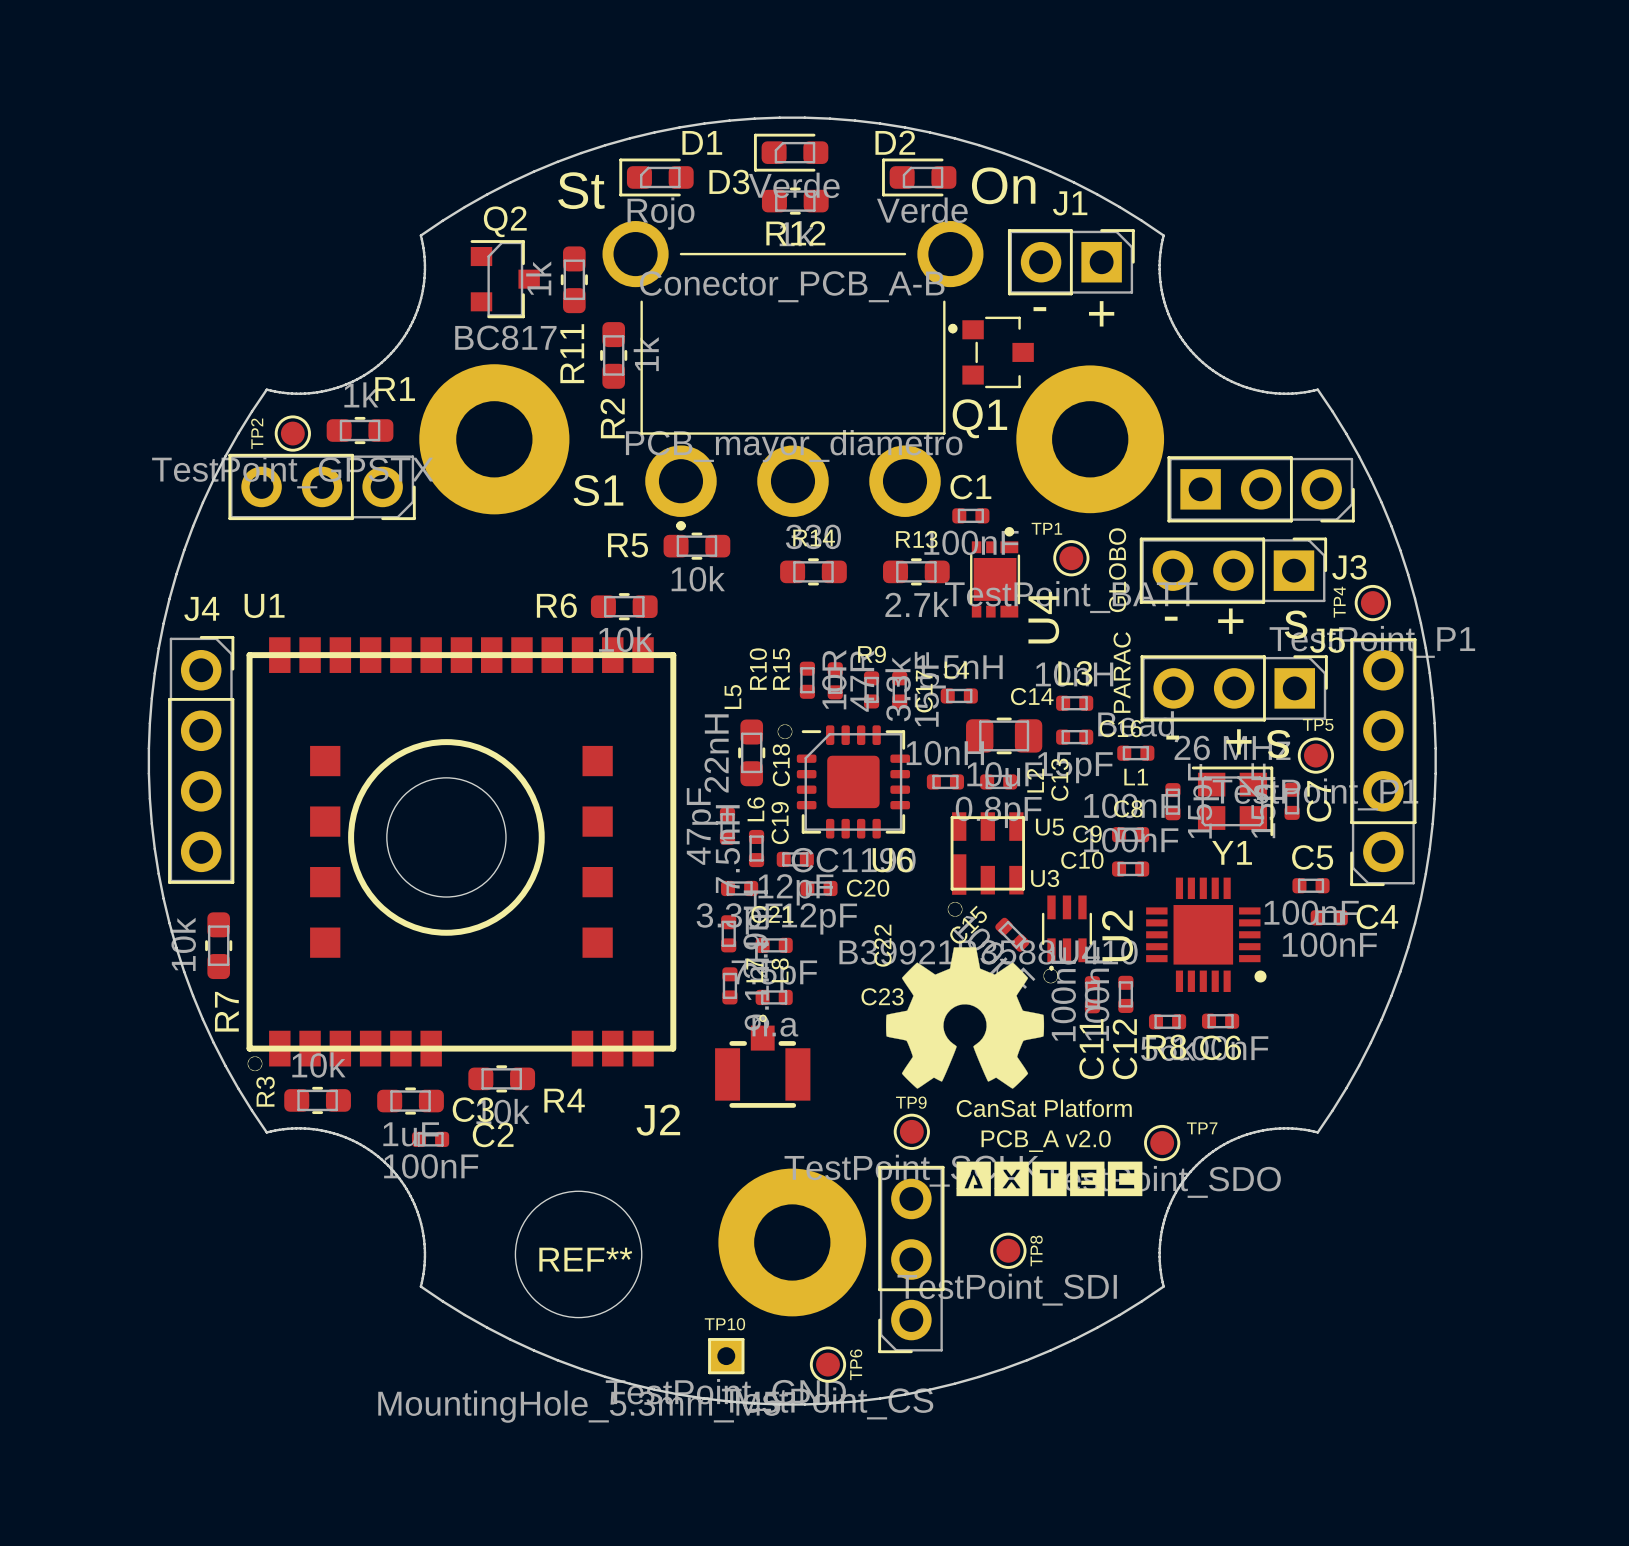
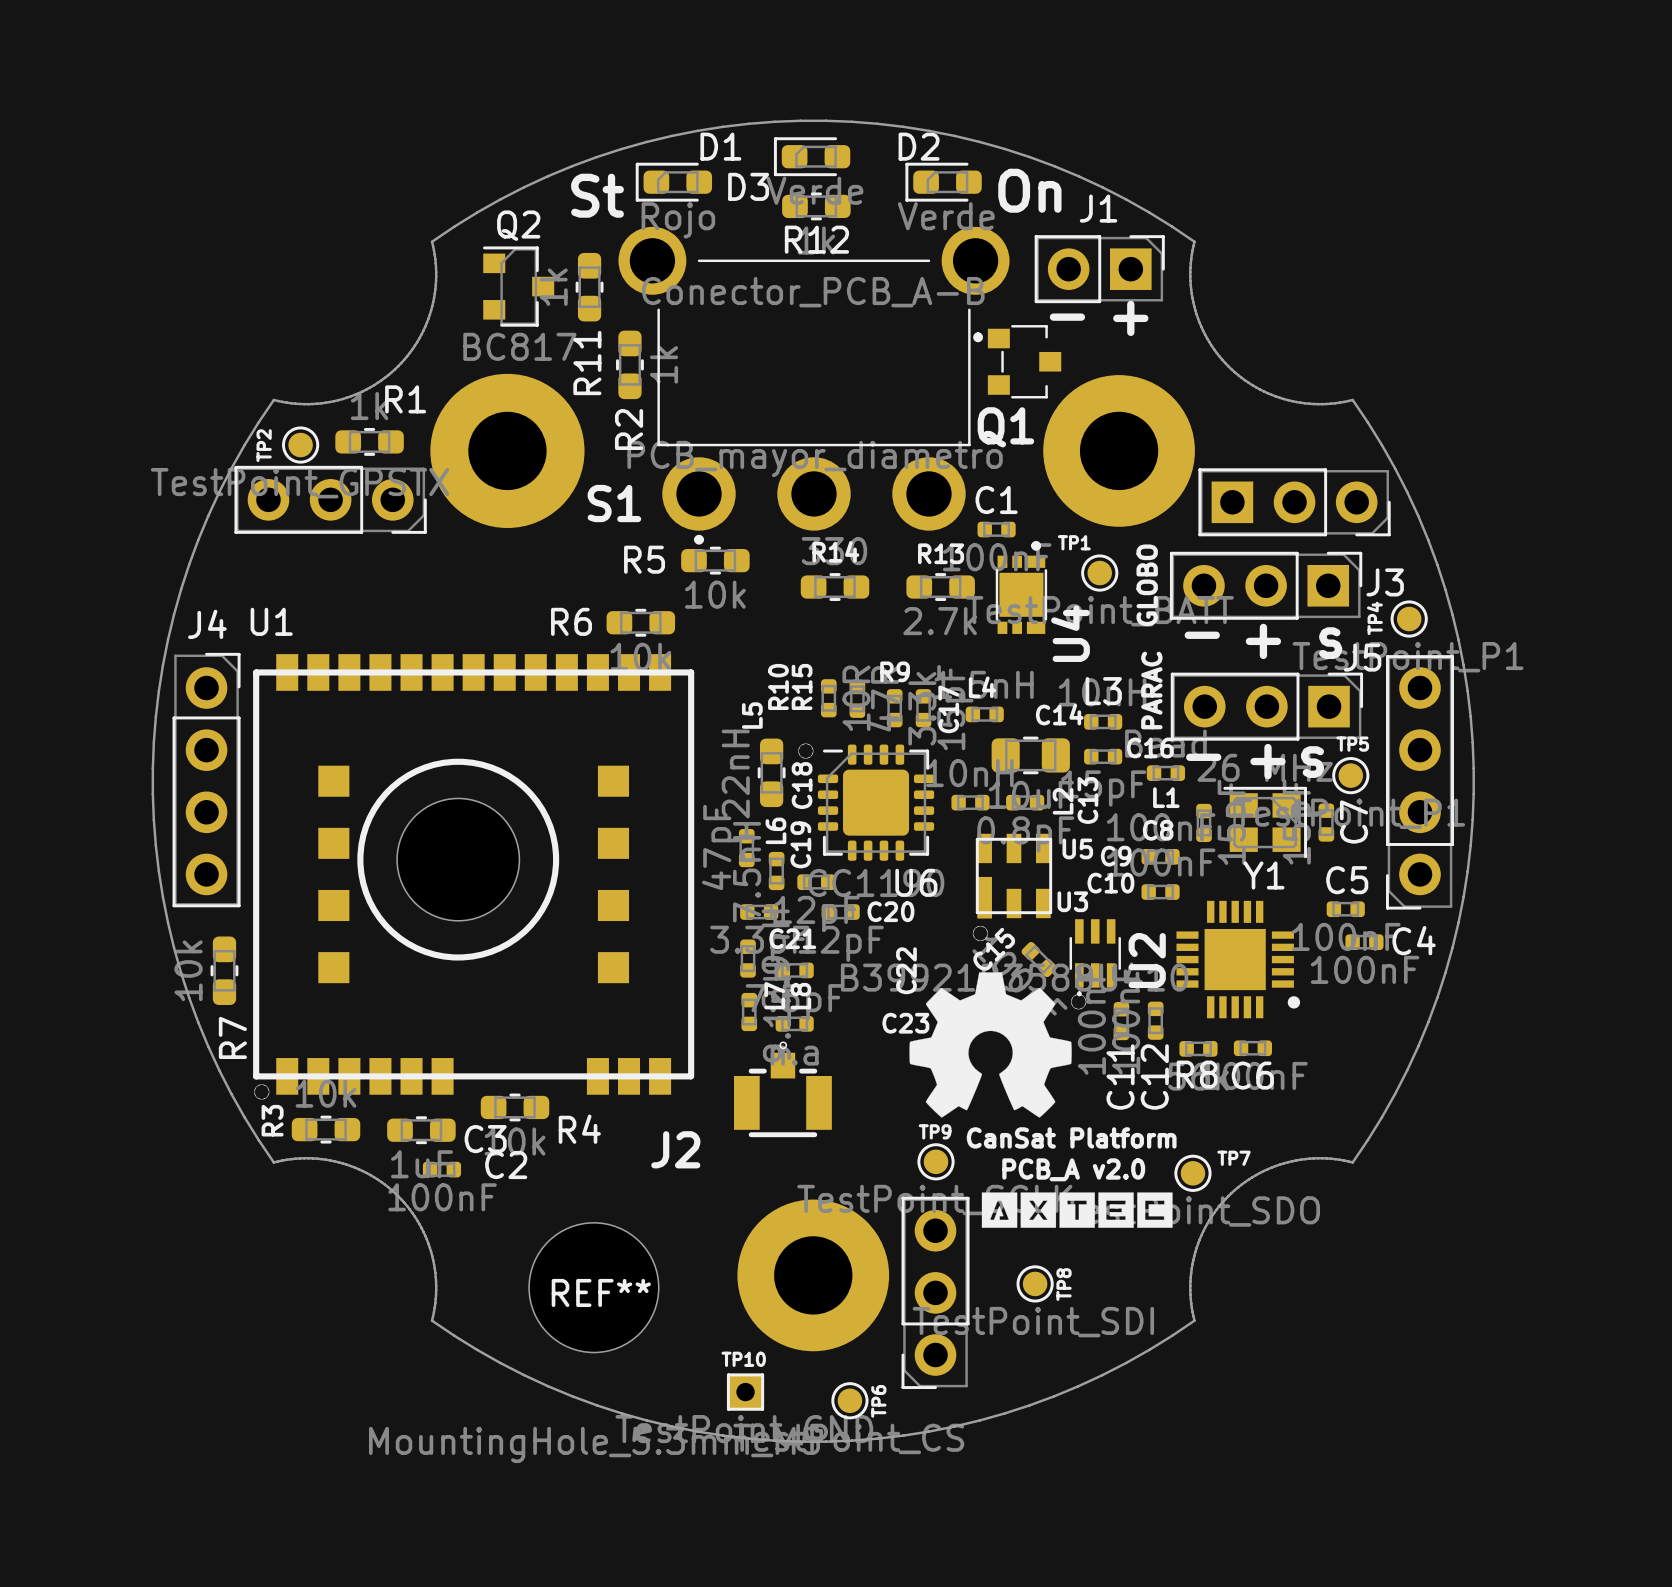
U6 footprint: [796, 725, 911, 839] -> [817, 744, 935, 861]

